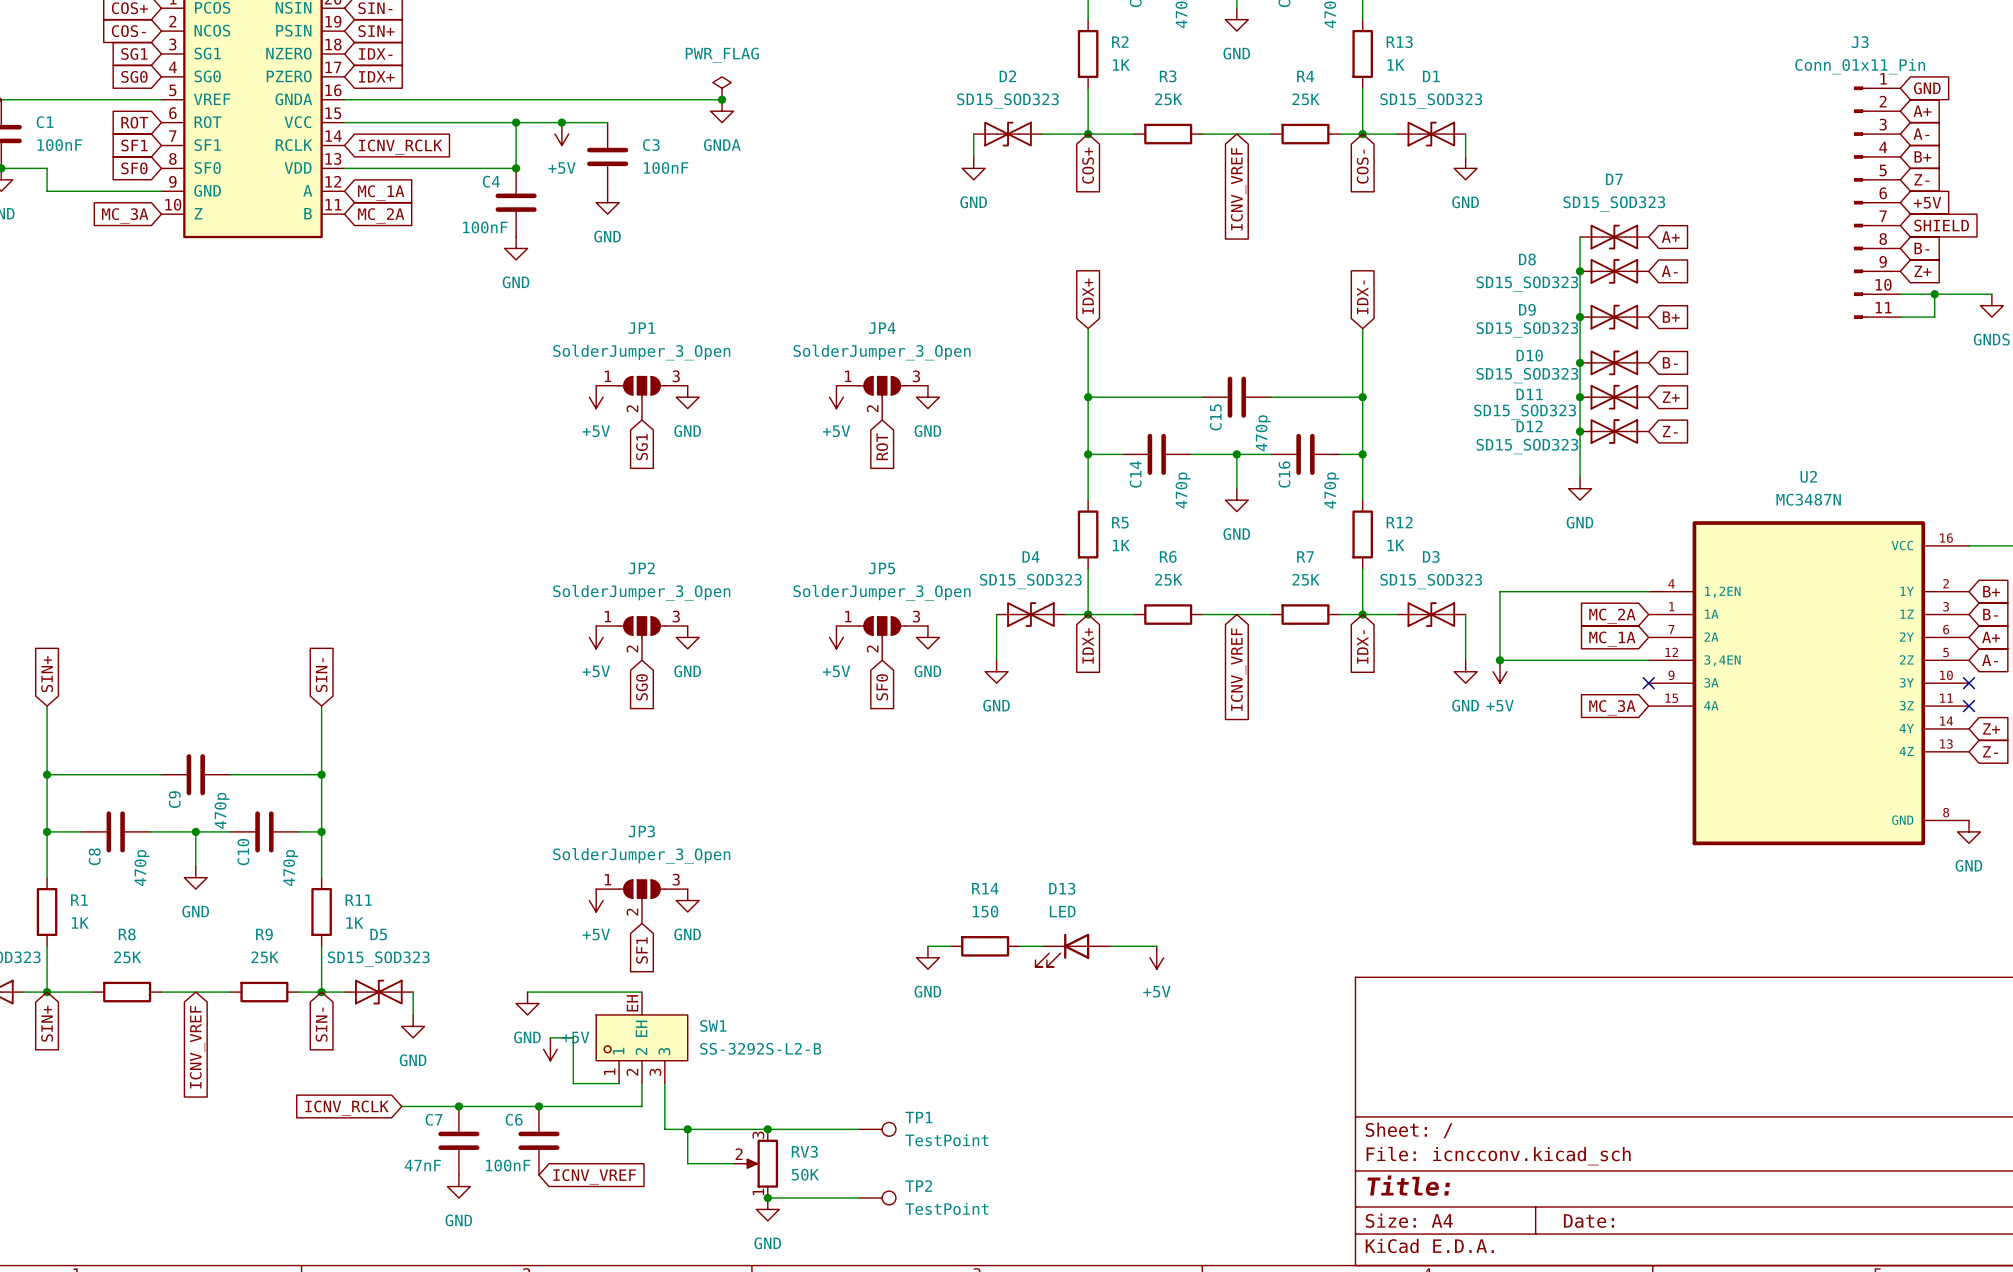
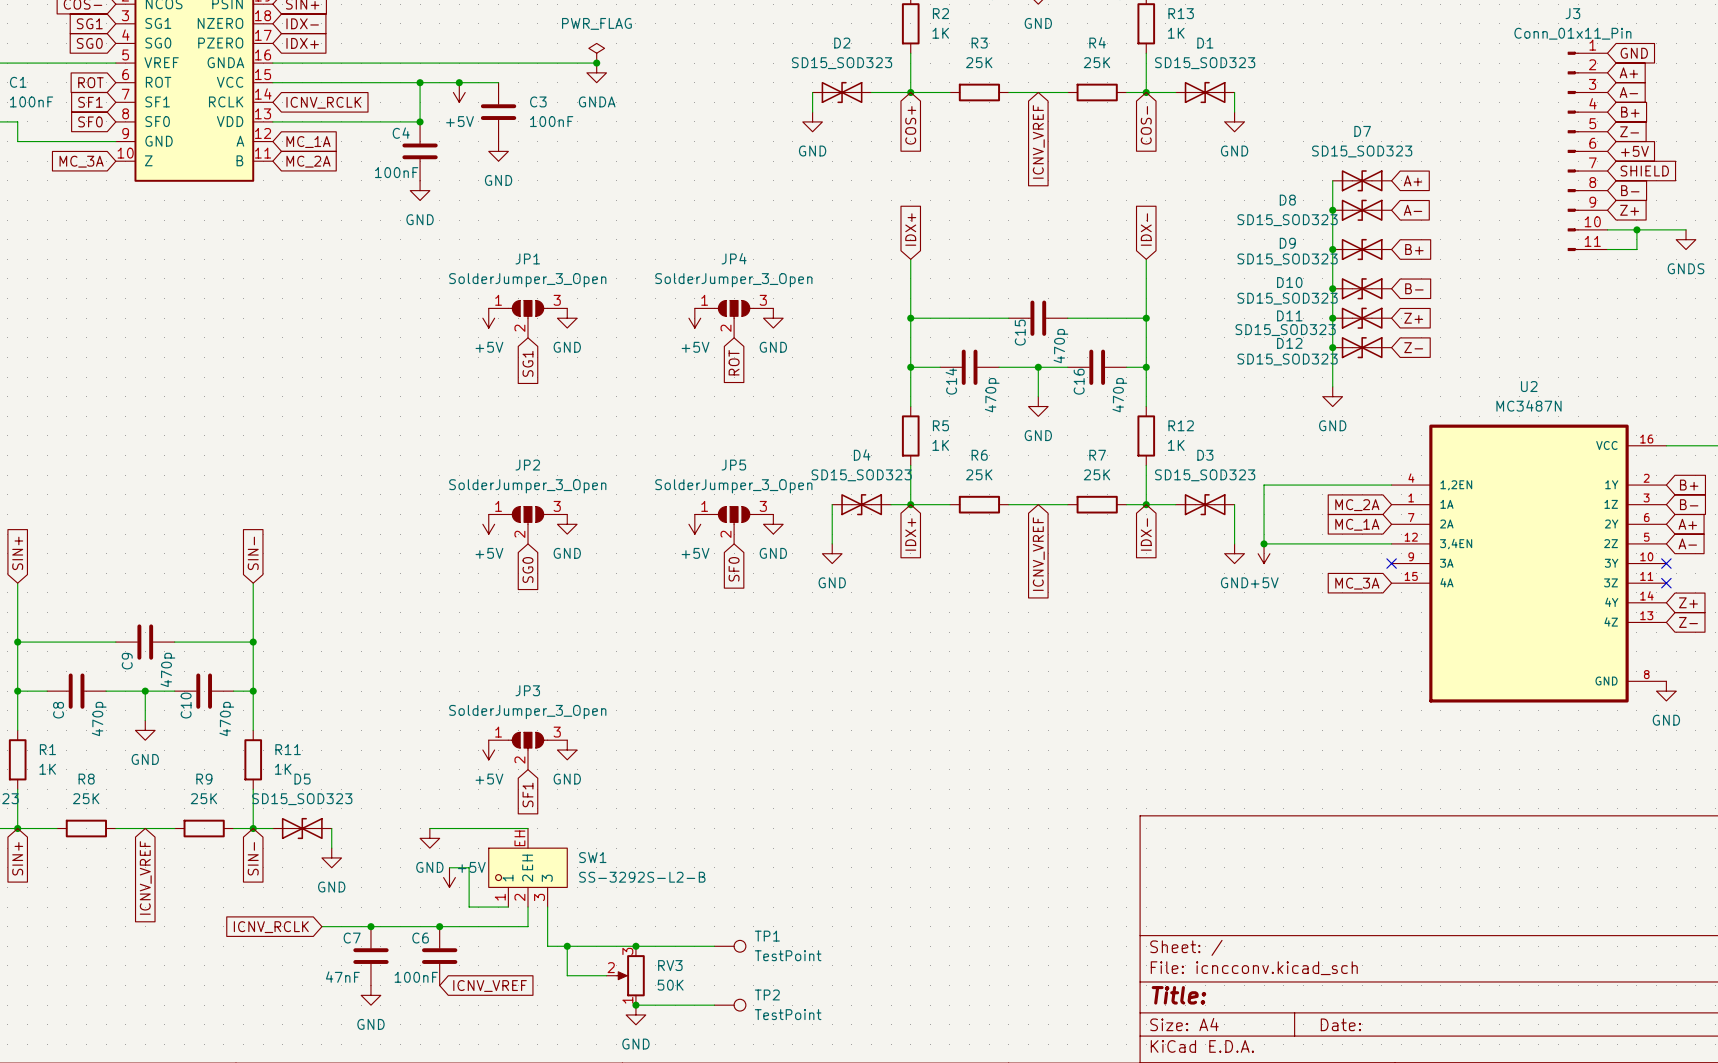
wire: (927, 946) (950, 946) -> none
R14: 150 (985, 946) -> none
wire: (1019, 946) (1042, 946) -> none
wire: (1111, 946) (1156, 946) -> none
D13: LED (1073, 950) -> none
power symbol: GND (927, 957) -> none
power symbol: +5V (1156, 957) -> none

